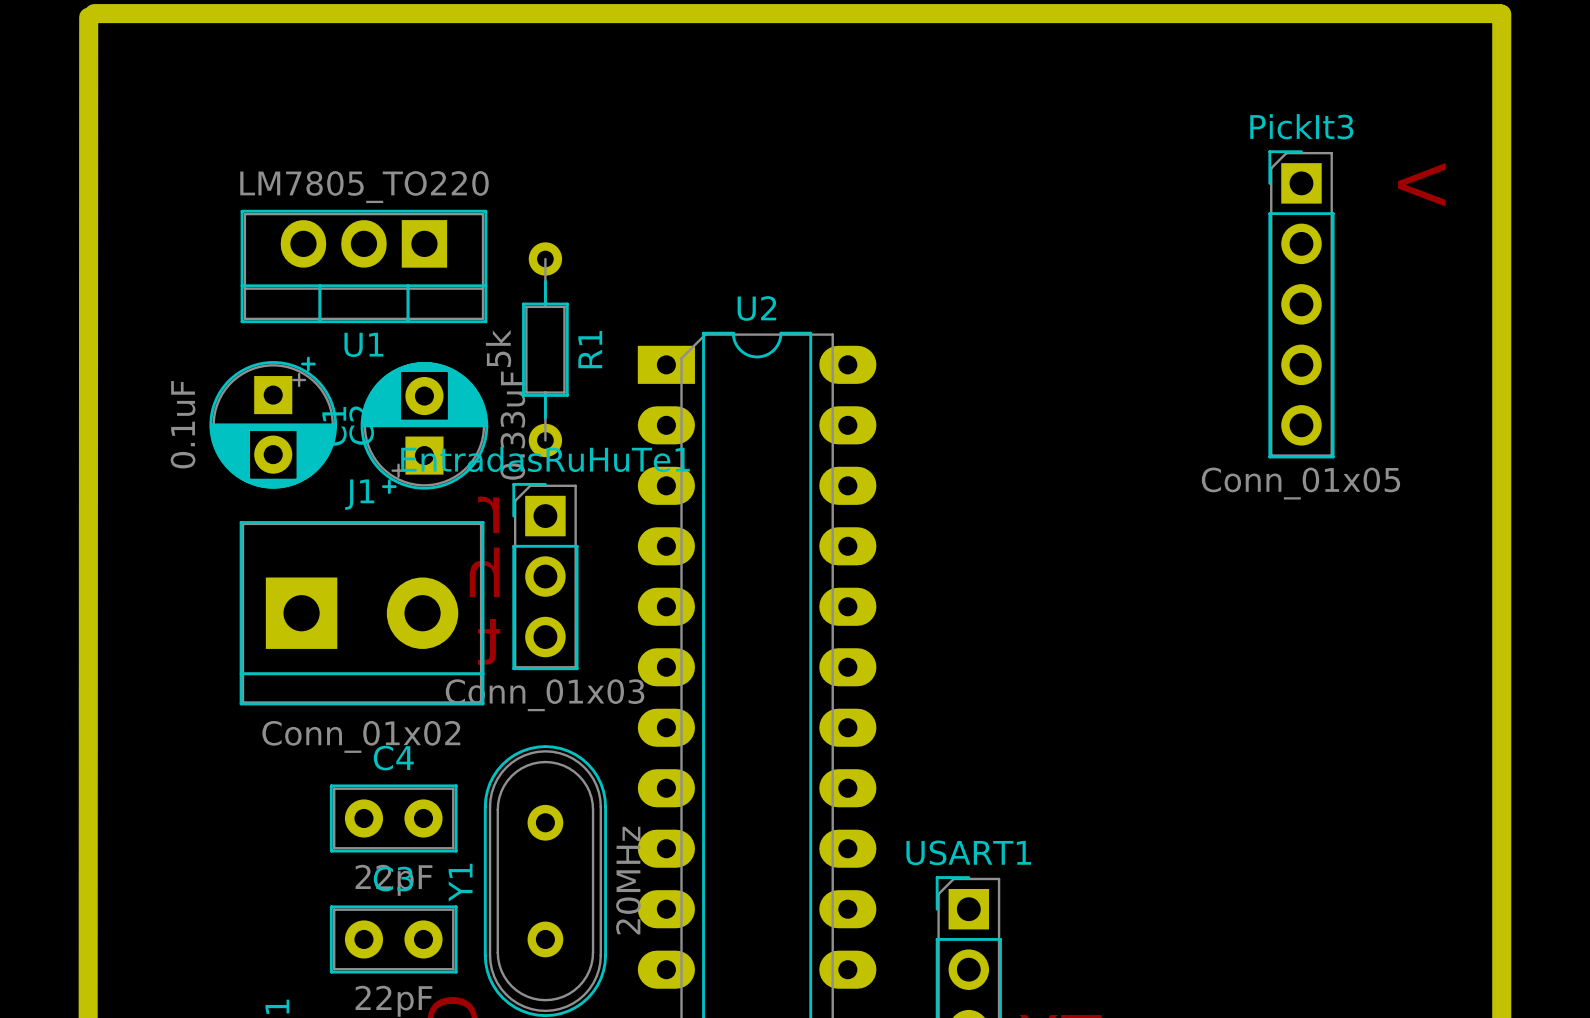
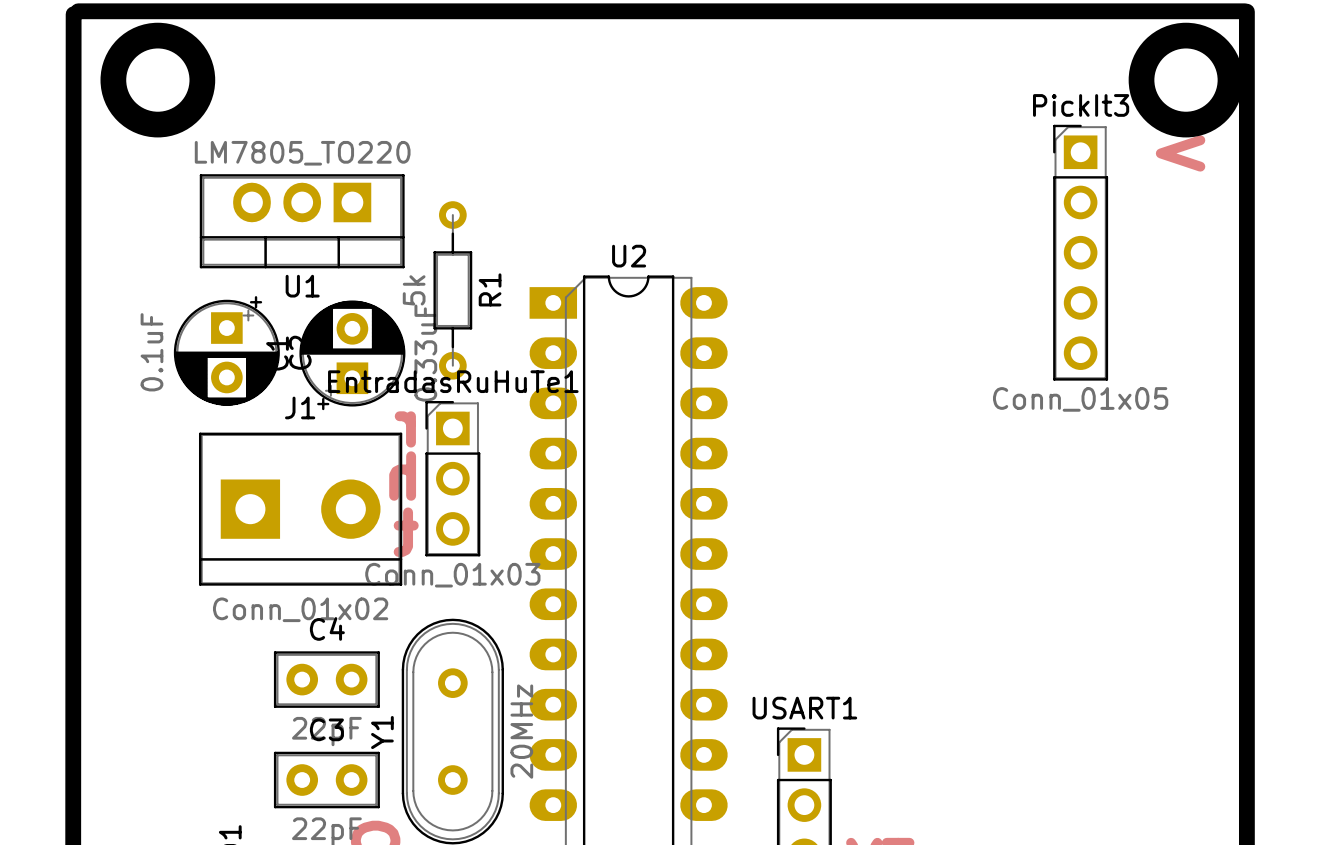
round board edge: none -> [100, 22, 216, 138]
round board edge: none -> [1128, 22, 1244, 138]
round board edge: none -> [110, 32, 206, 128]
round board edge: none -> [1138, 32, 1234, 128]

